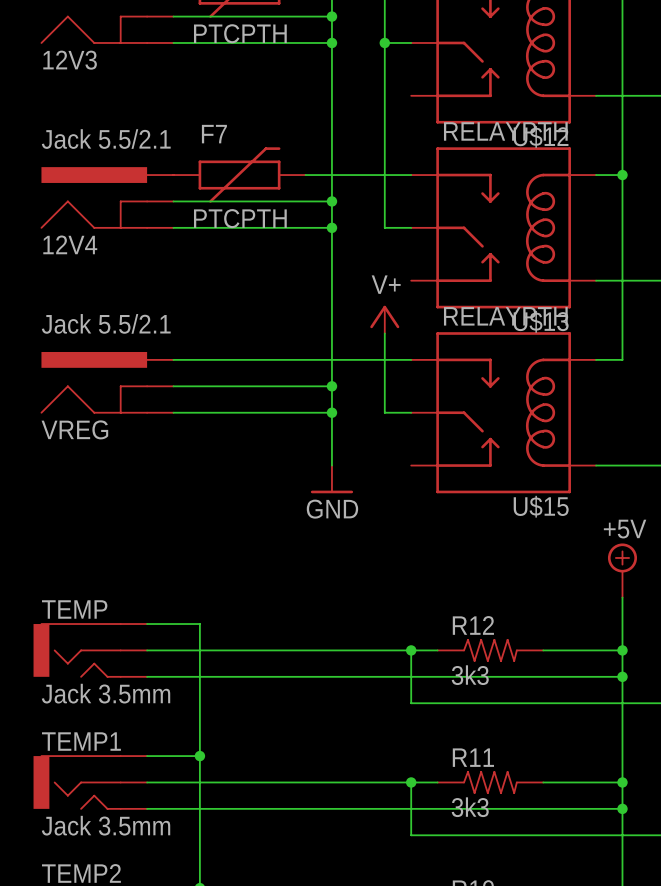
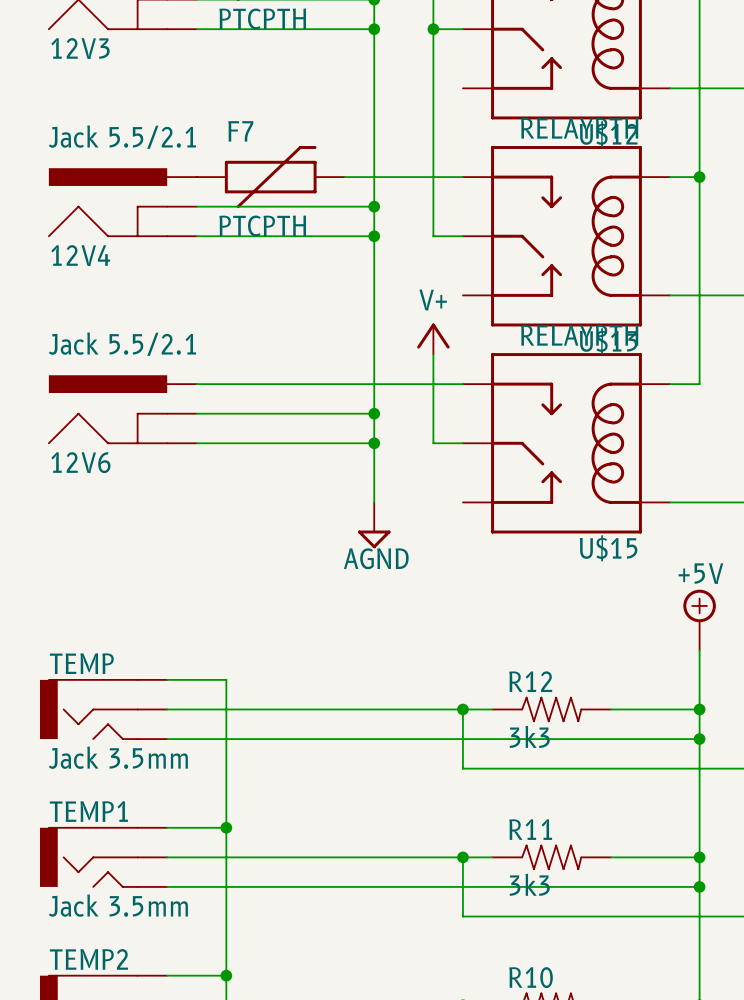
VREG name: VREG (74, 429) -> 12V6 (80, 462)
power symbol: GND (331, 479) -> AGND (374, 525)

